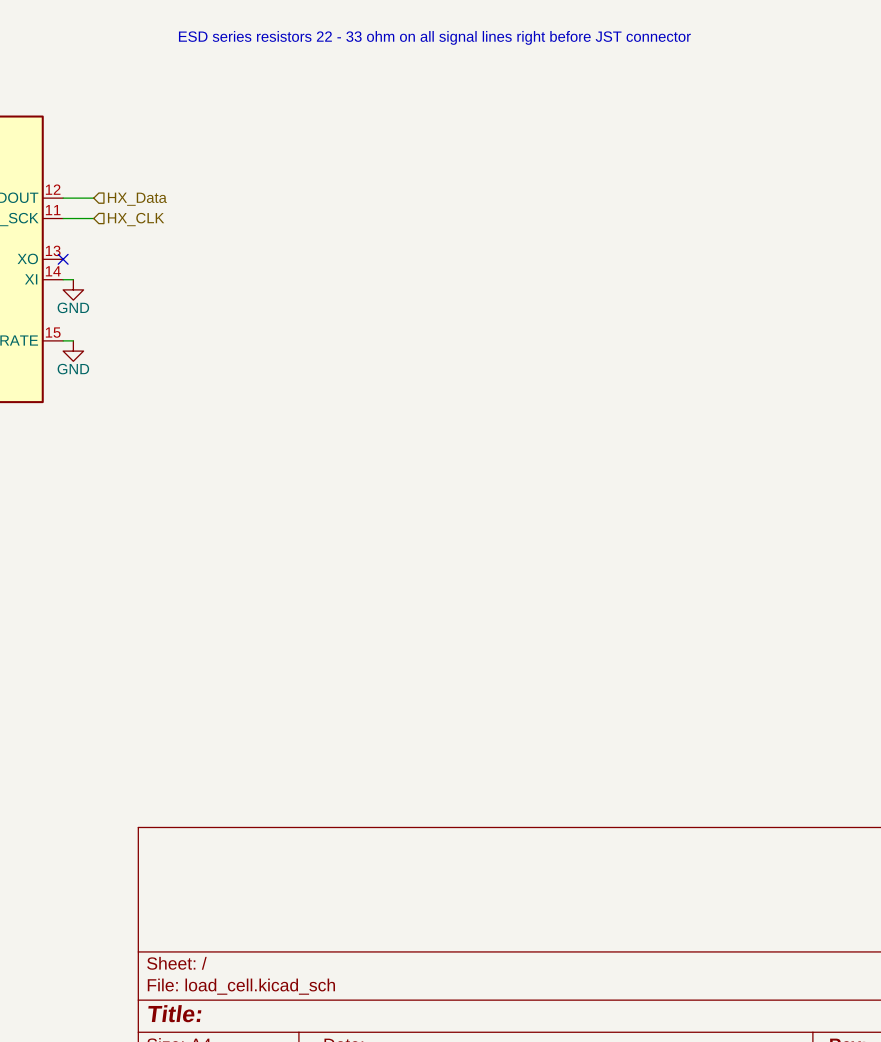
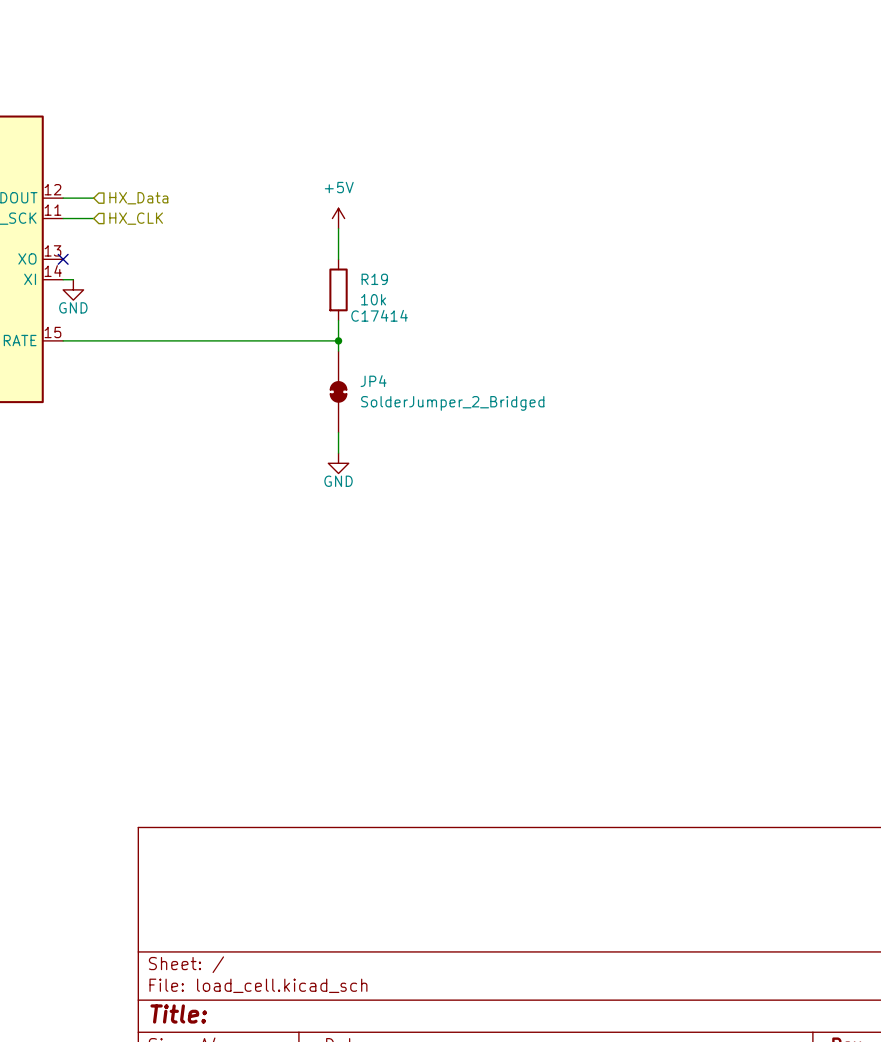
text: ESD series resistors 22 - 33 ohm on all signal lines right before JST connector (434, 37) -> none
power symbol: none -> +5V (338, 218)
wire: none -> (338, 228) (338, 259)
R19: none -> 10k (338, 289)
wire: none -> (338, 320) (338, 351)
wire: none -> (73, 340) (338, 340)
junction: none -> (338, 340)
power symbol: GND (73, 351) -> none
JP4: none -> SolderJumper_2_Bridged (338, 391)
wire: none -> (338, 432) (338, 453)
power symbol: none -> GND (338, 463)

